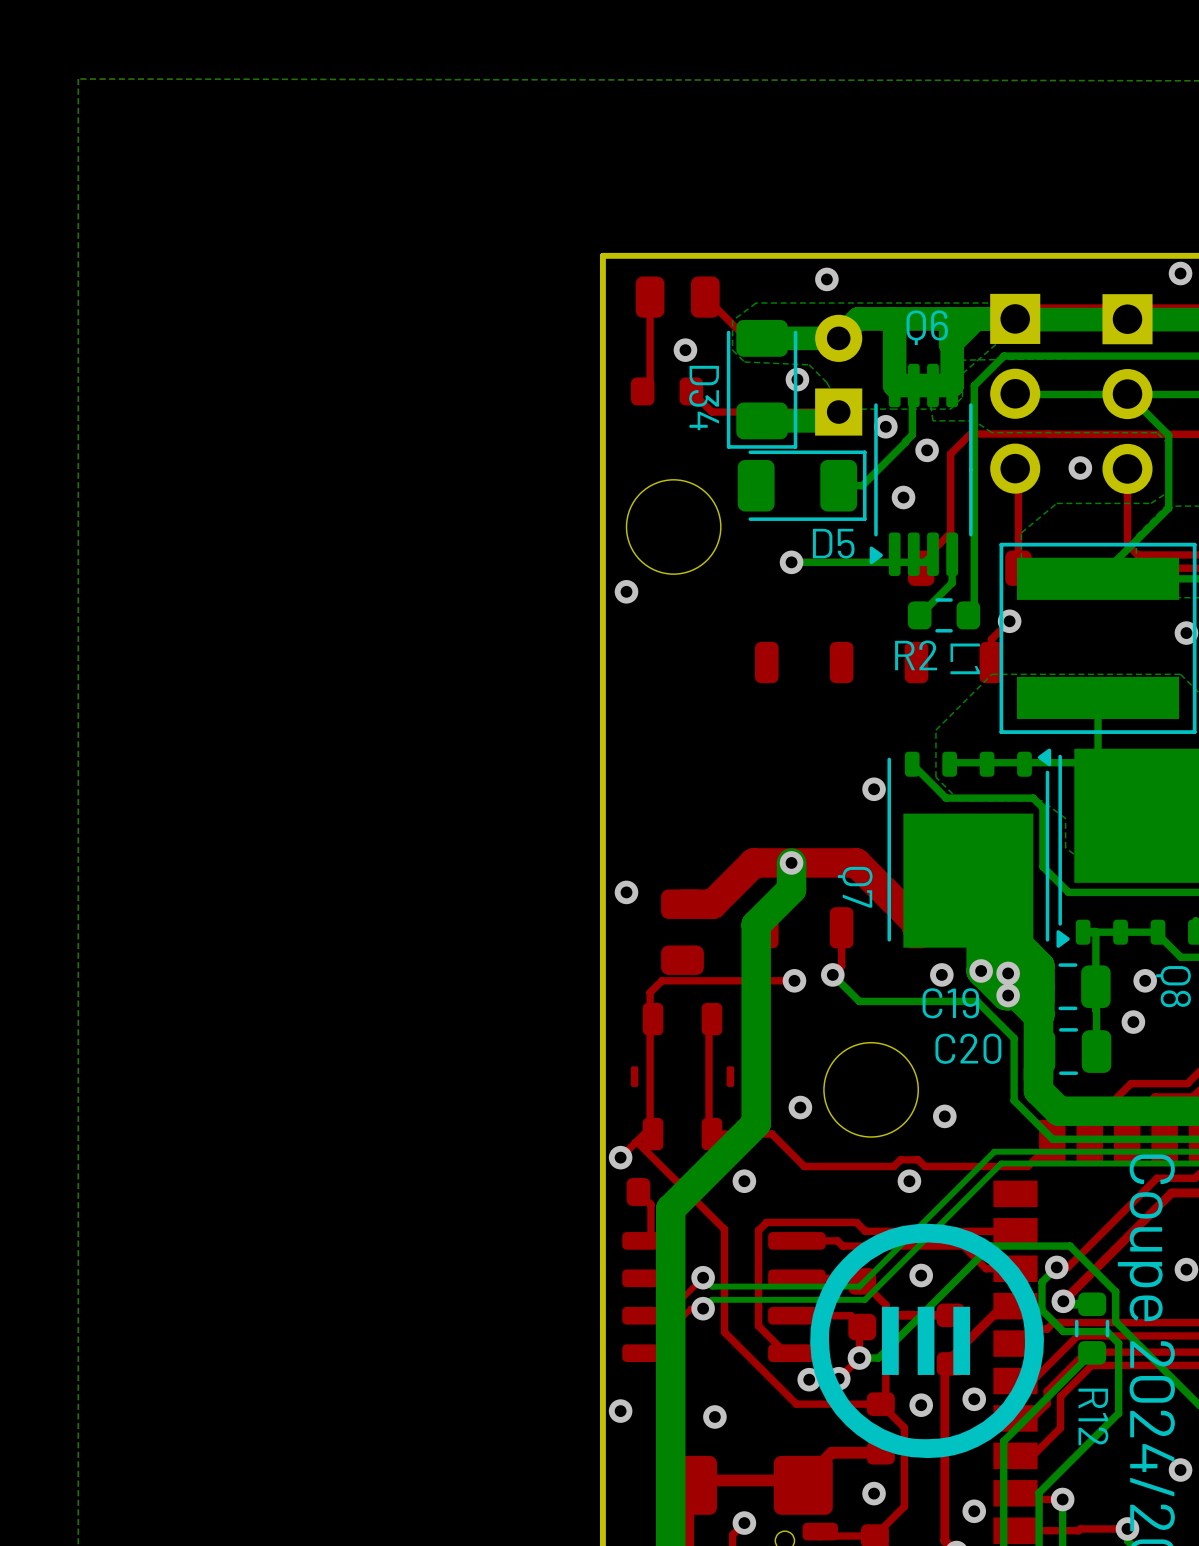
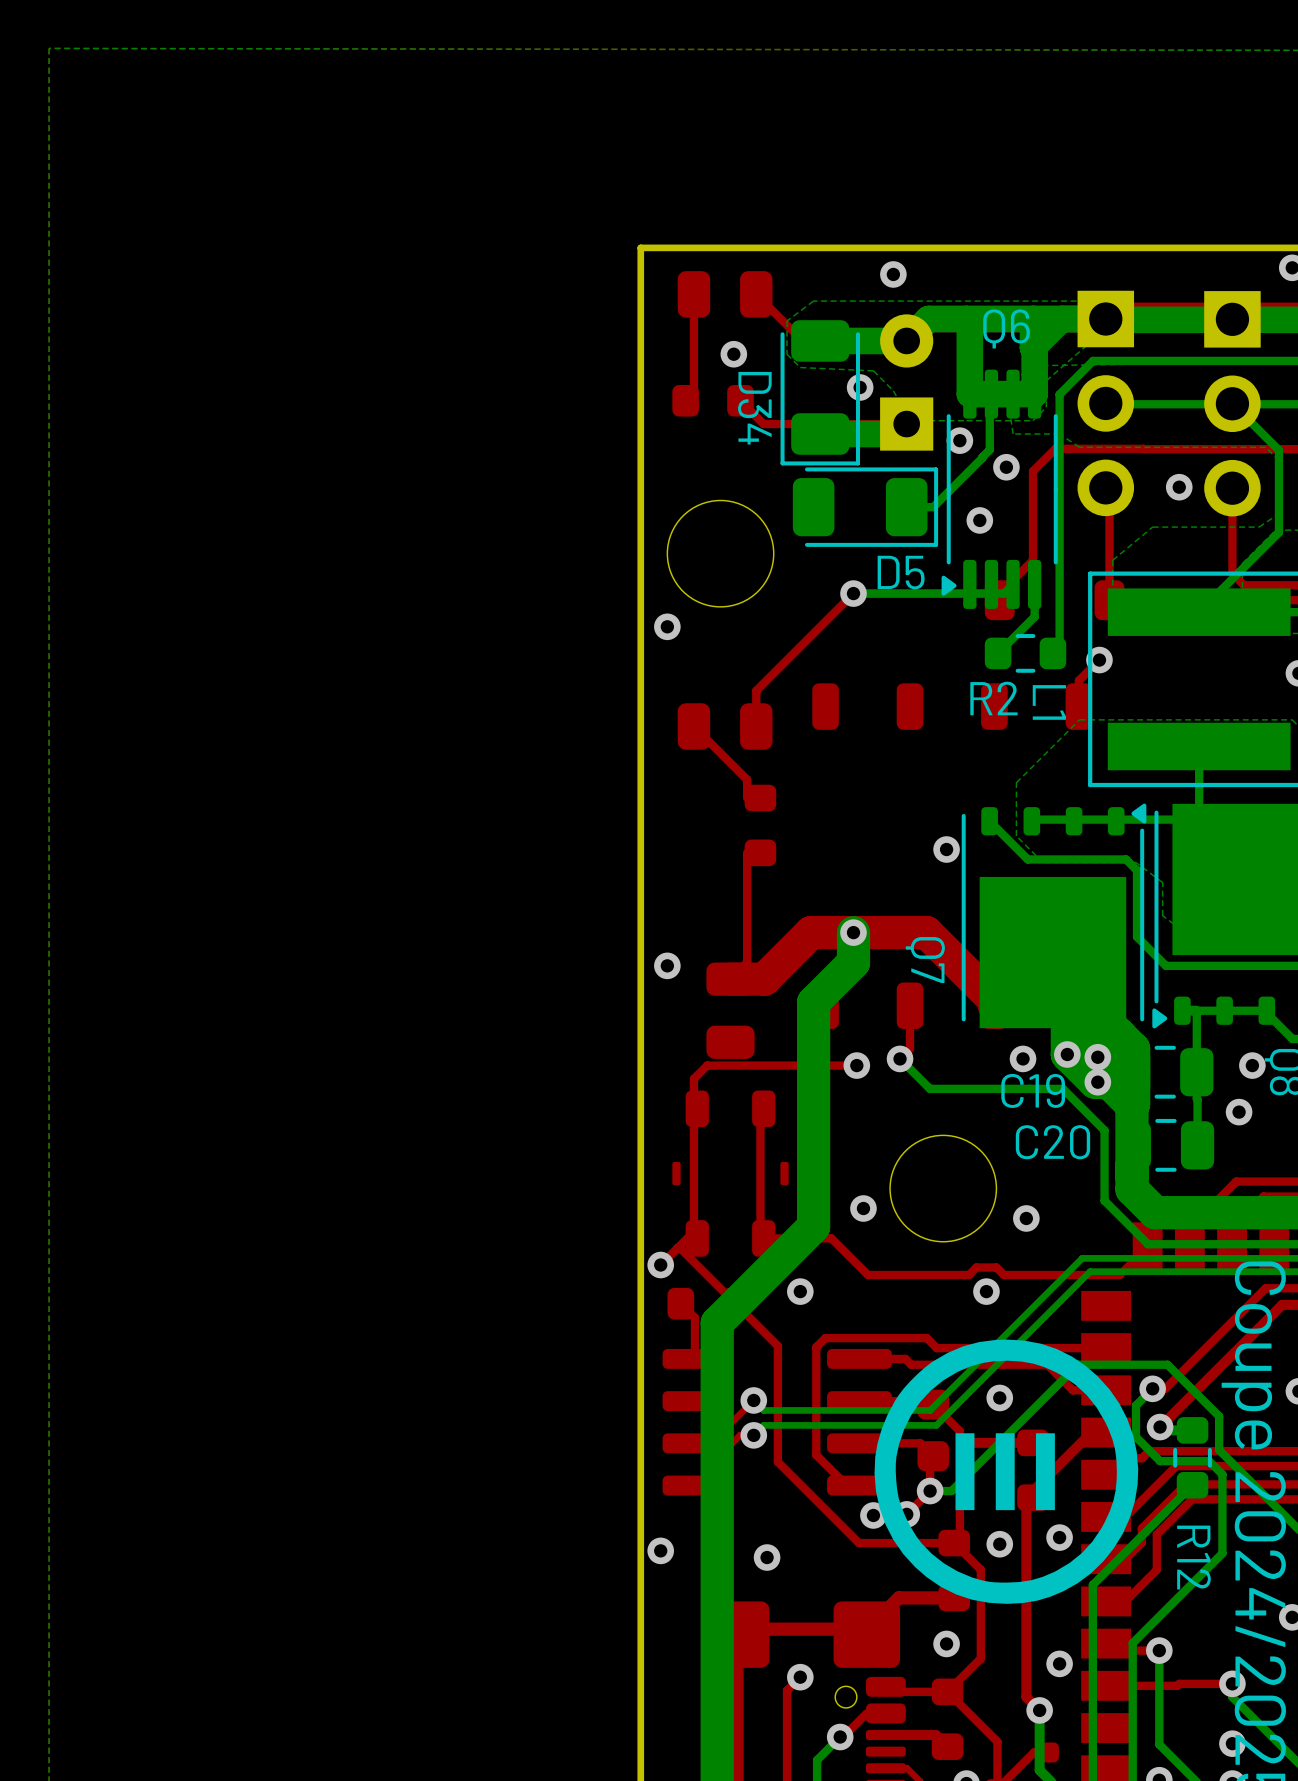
top track: none -> (846, 600) (756, 690) (756, 726)
top track: none -> (693, 726) (747, 779) (747, 797)
part: none -> (725, 726)
part: none -> (760, 825)
top track: none -> (747, 852) (747, 962) (730, 979)

